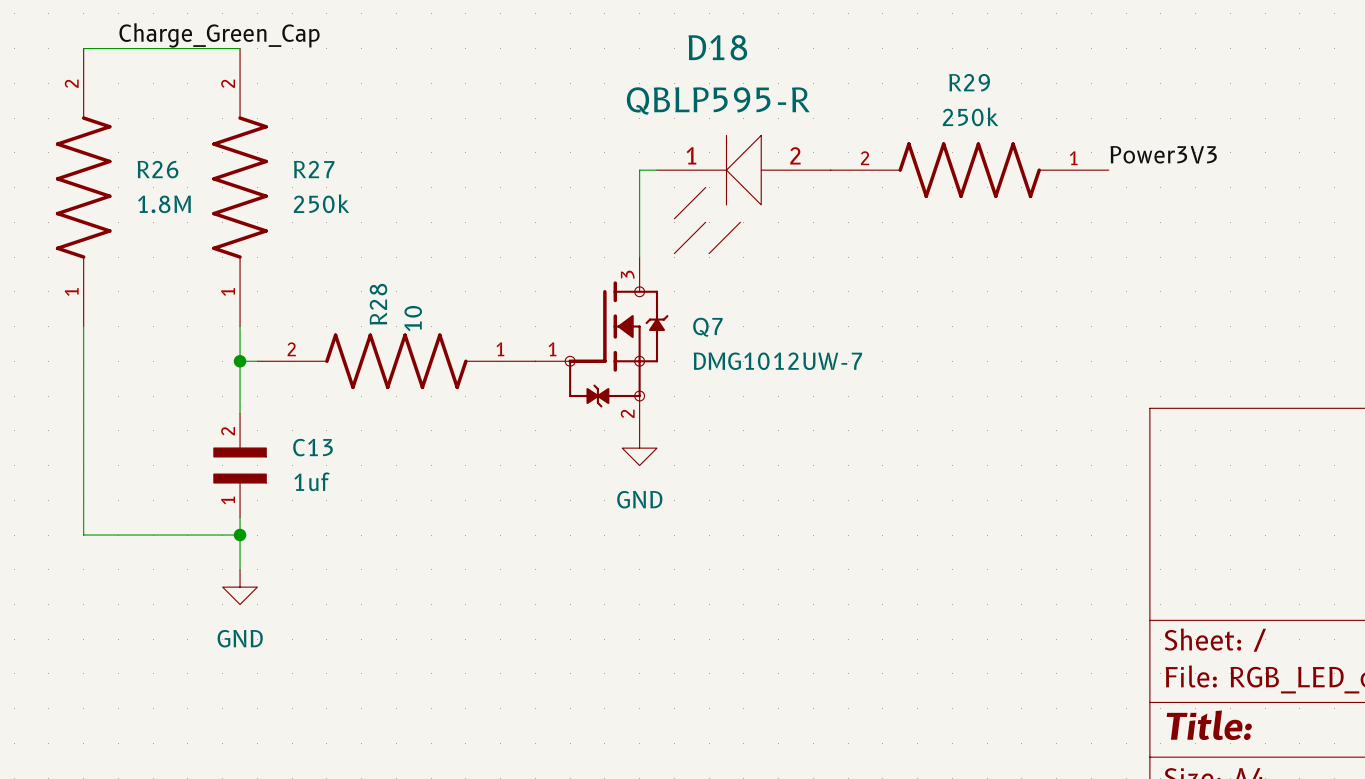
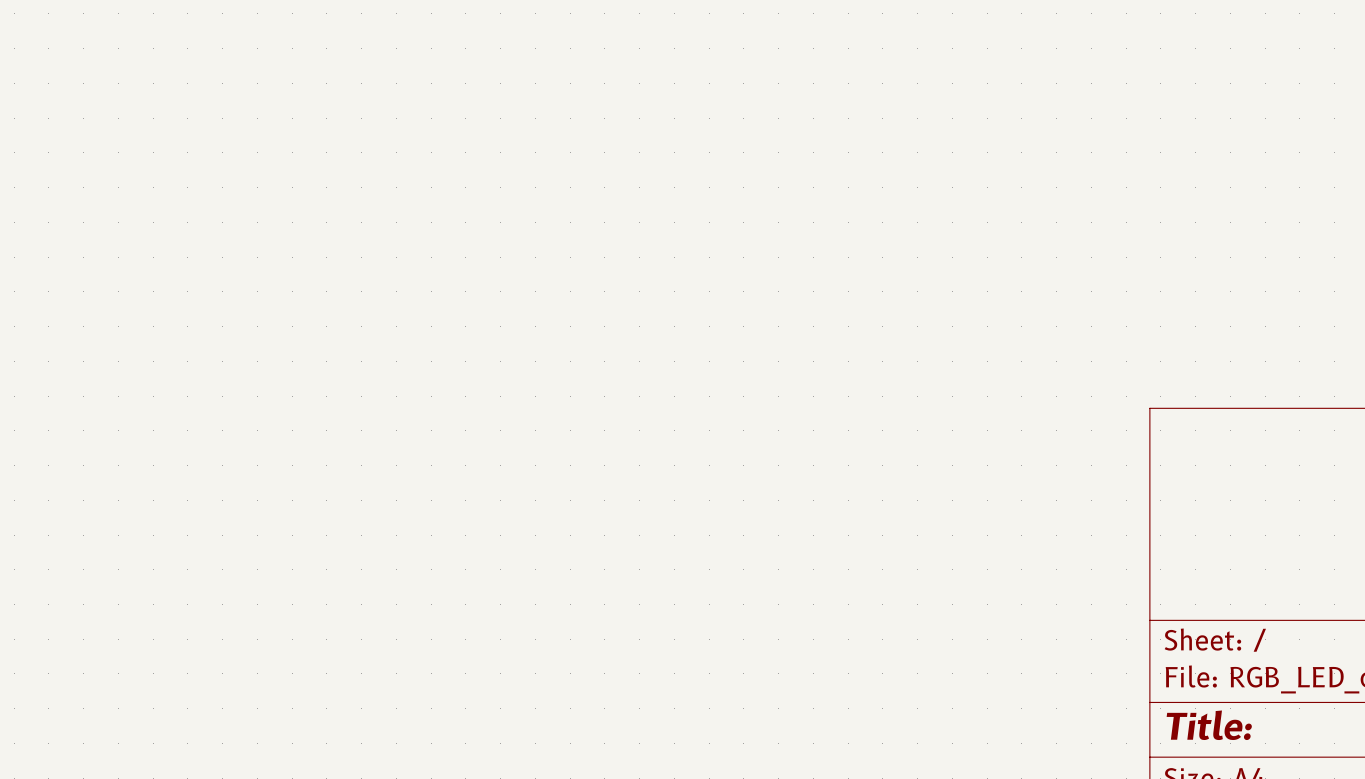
label: Charge_Green_Cap (219, 35) -> none
wire: (83, 48) (240, 48) -> none
label: Power3V3 (1163, 154) -> none
wire: (656, 170) (639, 170) (639, 257) -> none
R29: 250k (969, 170) -> none
R26: 1.8M (83, 187) -> none
R27: 250k (240, 187) -> none
D18: QBLP595-R (743, 194) -> none
wire: (83, 326) (83, 535) (240, 535) -> none
wire: (240, 326) (240, 413) -> none
Q7: DMG1012UW-7 (601, 343) -> none
wire: (240, 361) (257, 361) -> none
junction: (240, 361) -> none
R28: 10 (396, 361) -> none
power symbol: GND (639, 448) -> none
C13: 1uf (240, 465) -> none
wire: (240, 517) (240, 569) -> none
junction: (240, 535) -> none
power symbol: GND (240, 587) -> none

